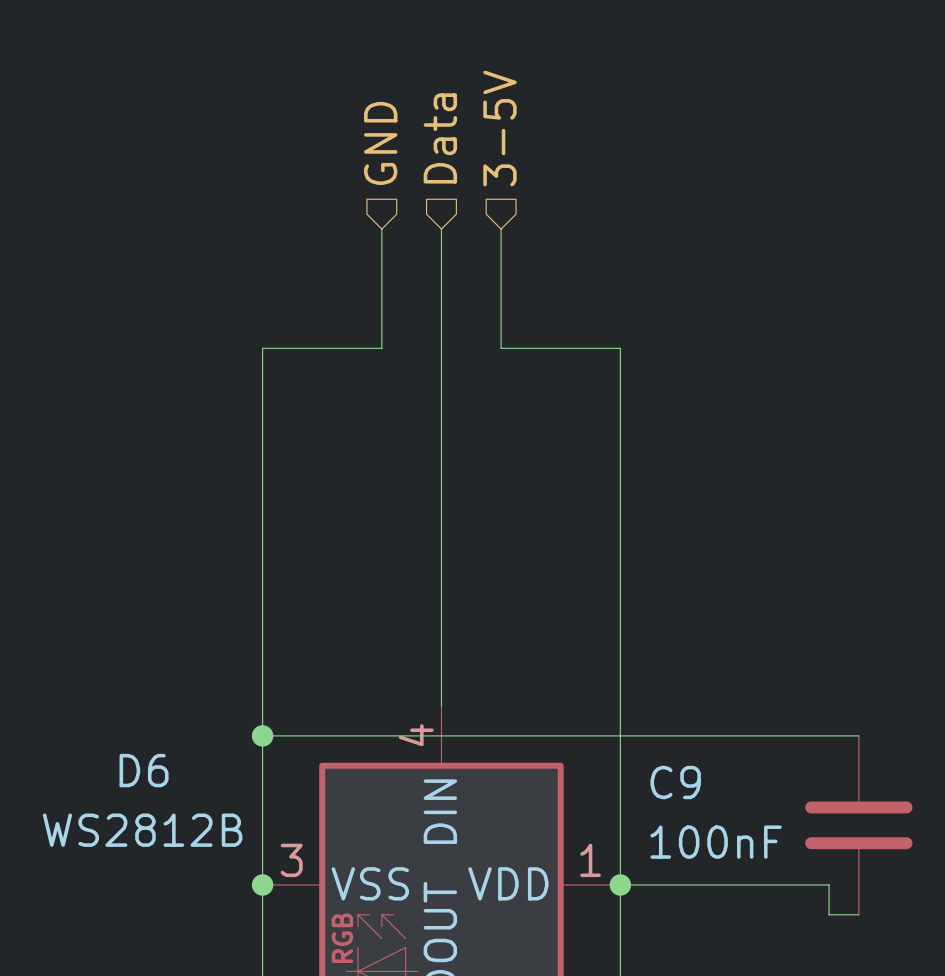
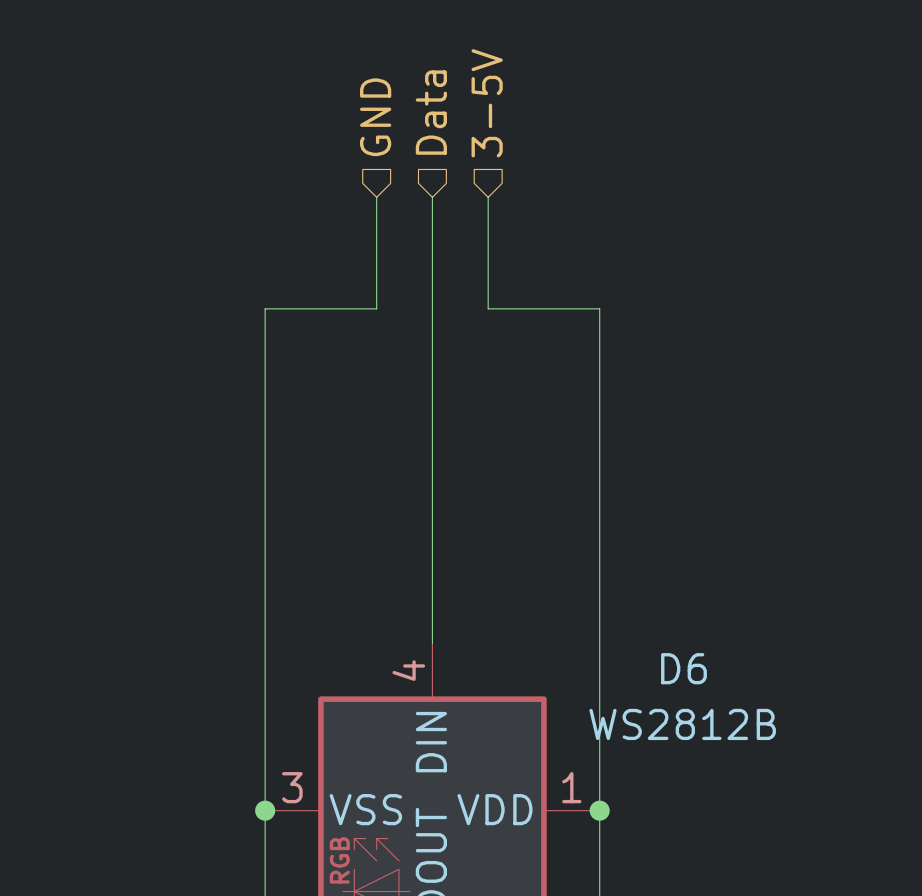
wire: (262, 735) (858, 735) -> none
junction: (262, 735) -> none
D6 name position: D6 (144, 770) -> D6 (684, 668)
C9: 100nF (858, 825) -> none
D6 value position: WS2812B (142, 830) -> WS2812B (682, 724)
wire: (620, 884) (829, 884) (829, 914) (858, 914) -> none

